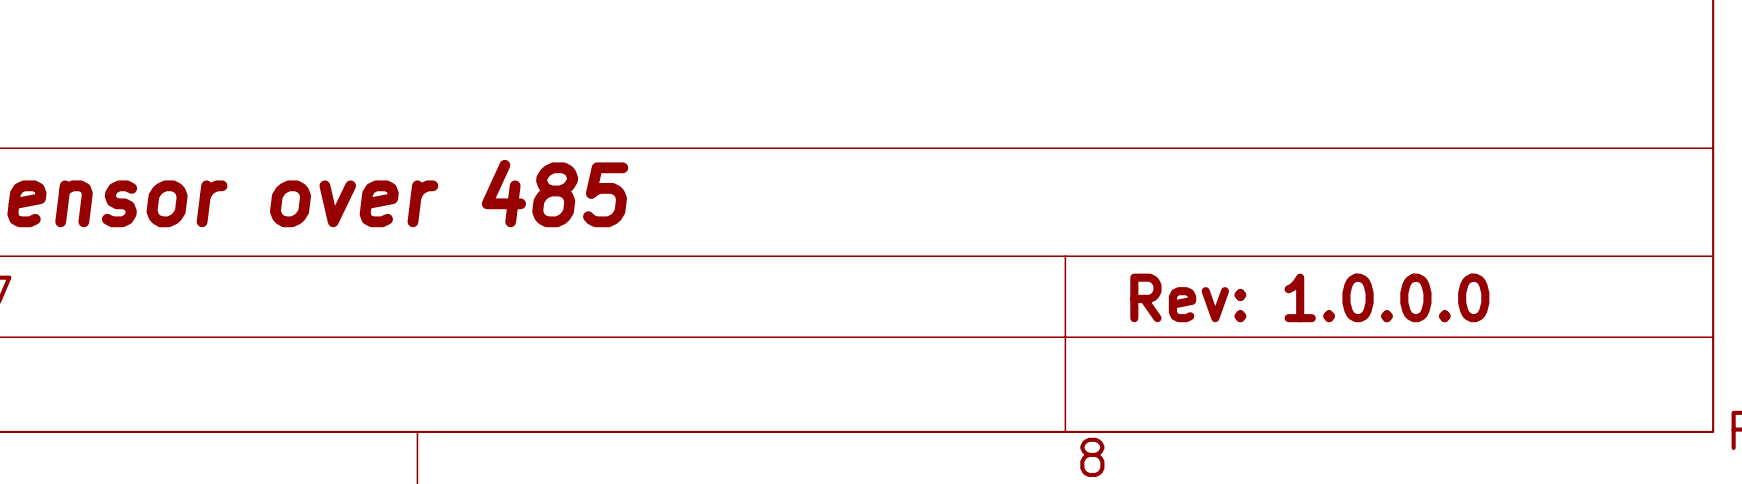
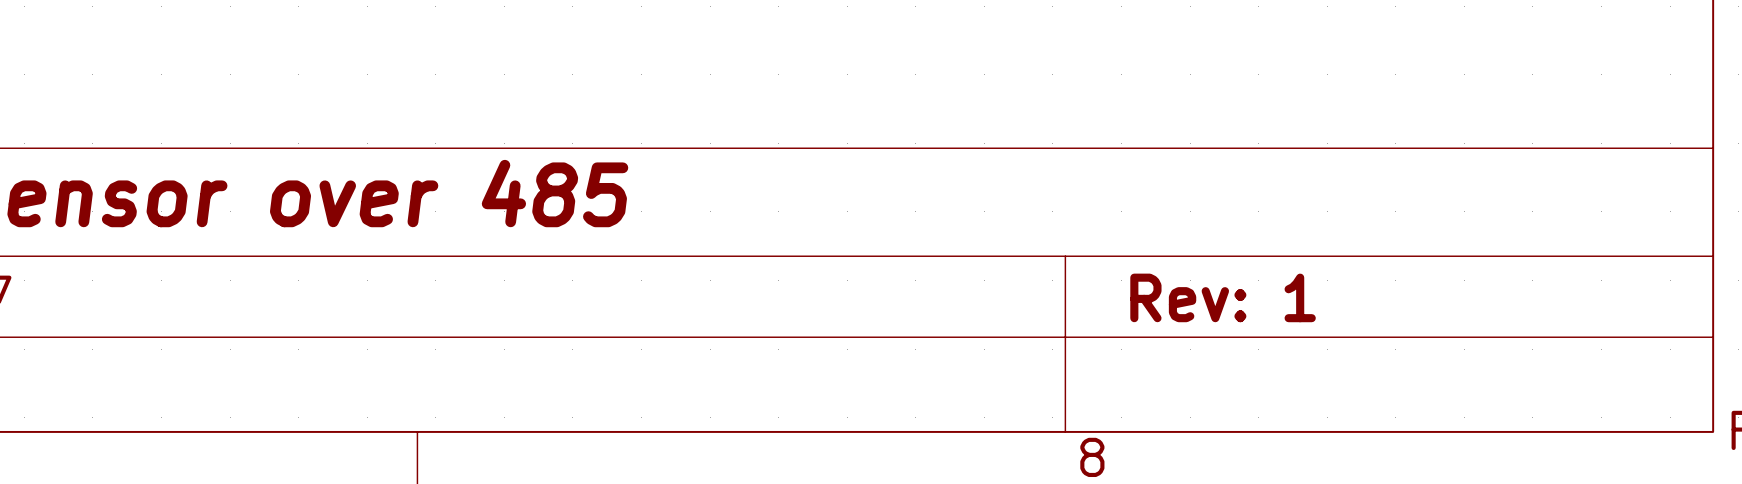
title block: Rev: 1.0.0.0 (1309, 297) -> Rev: 1 (1223, 297)

